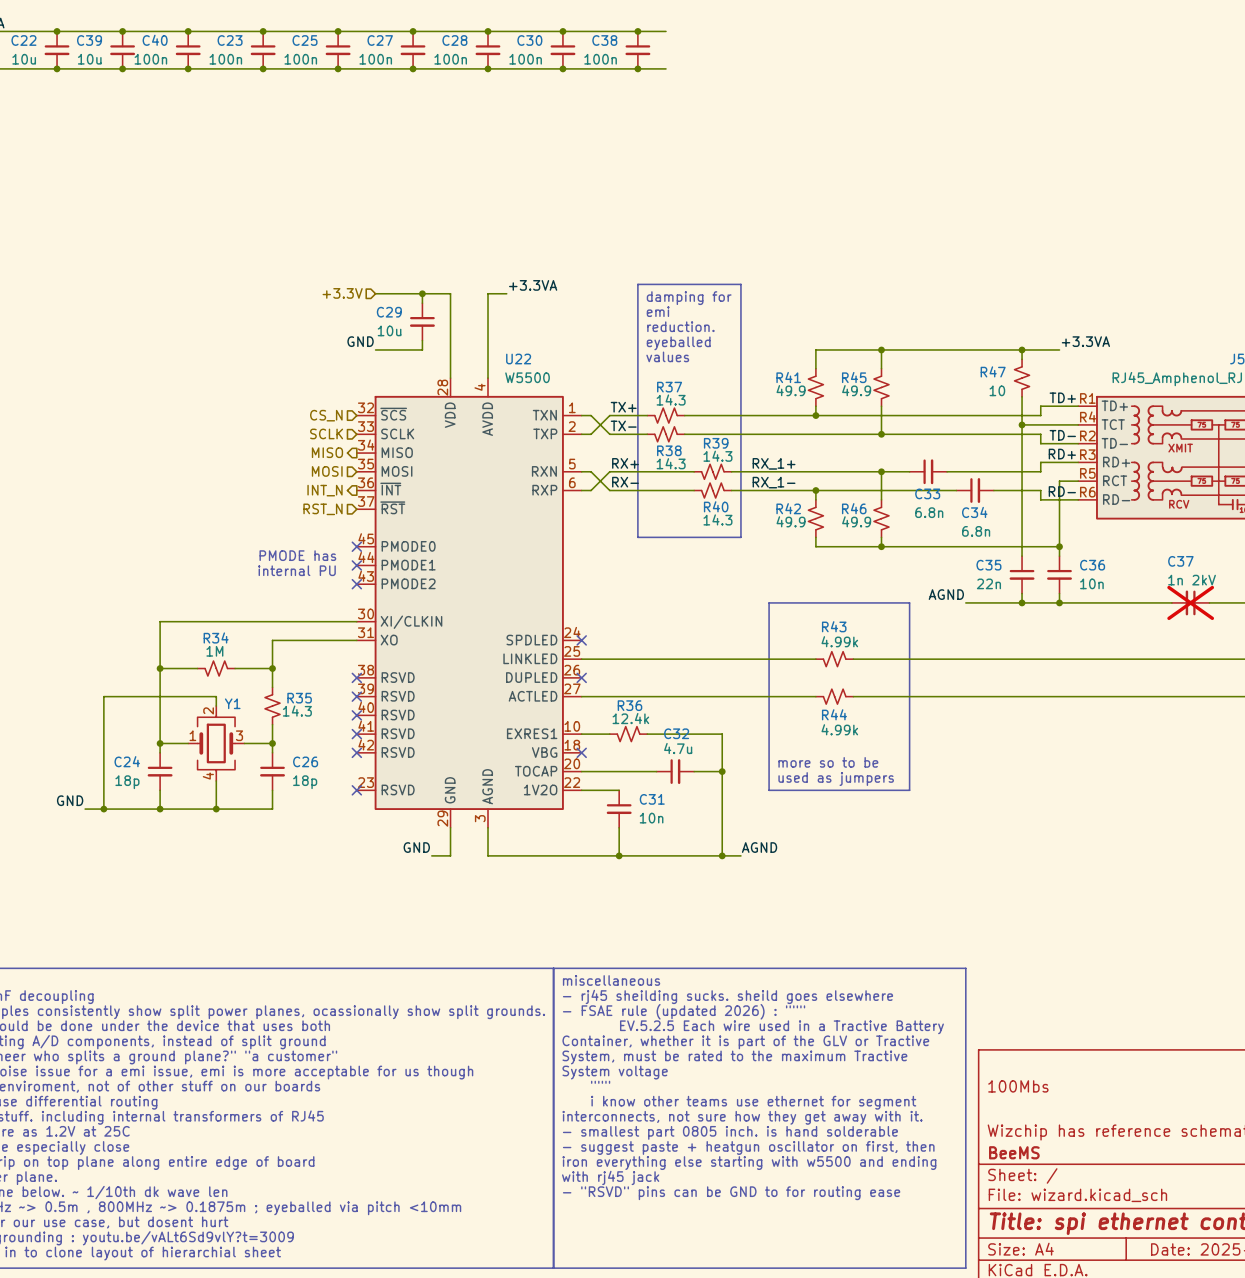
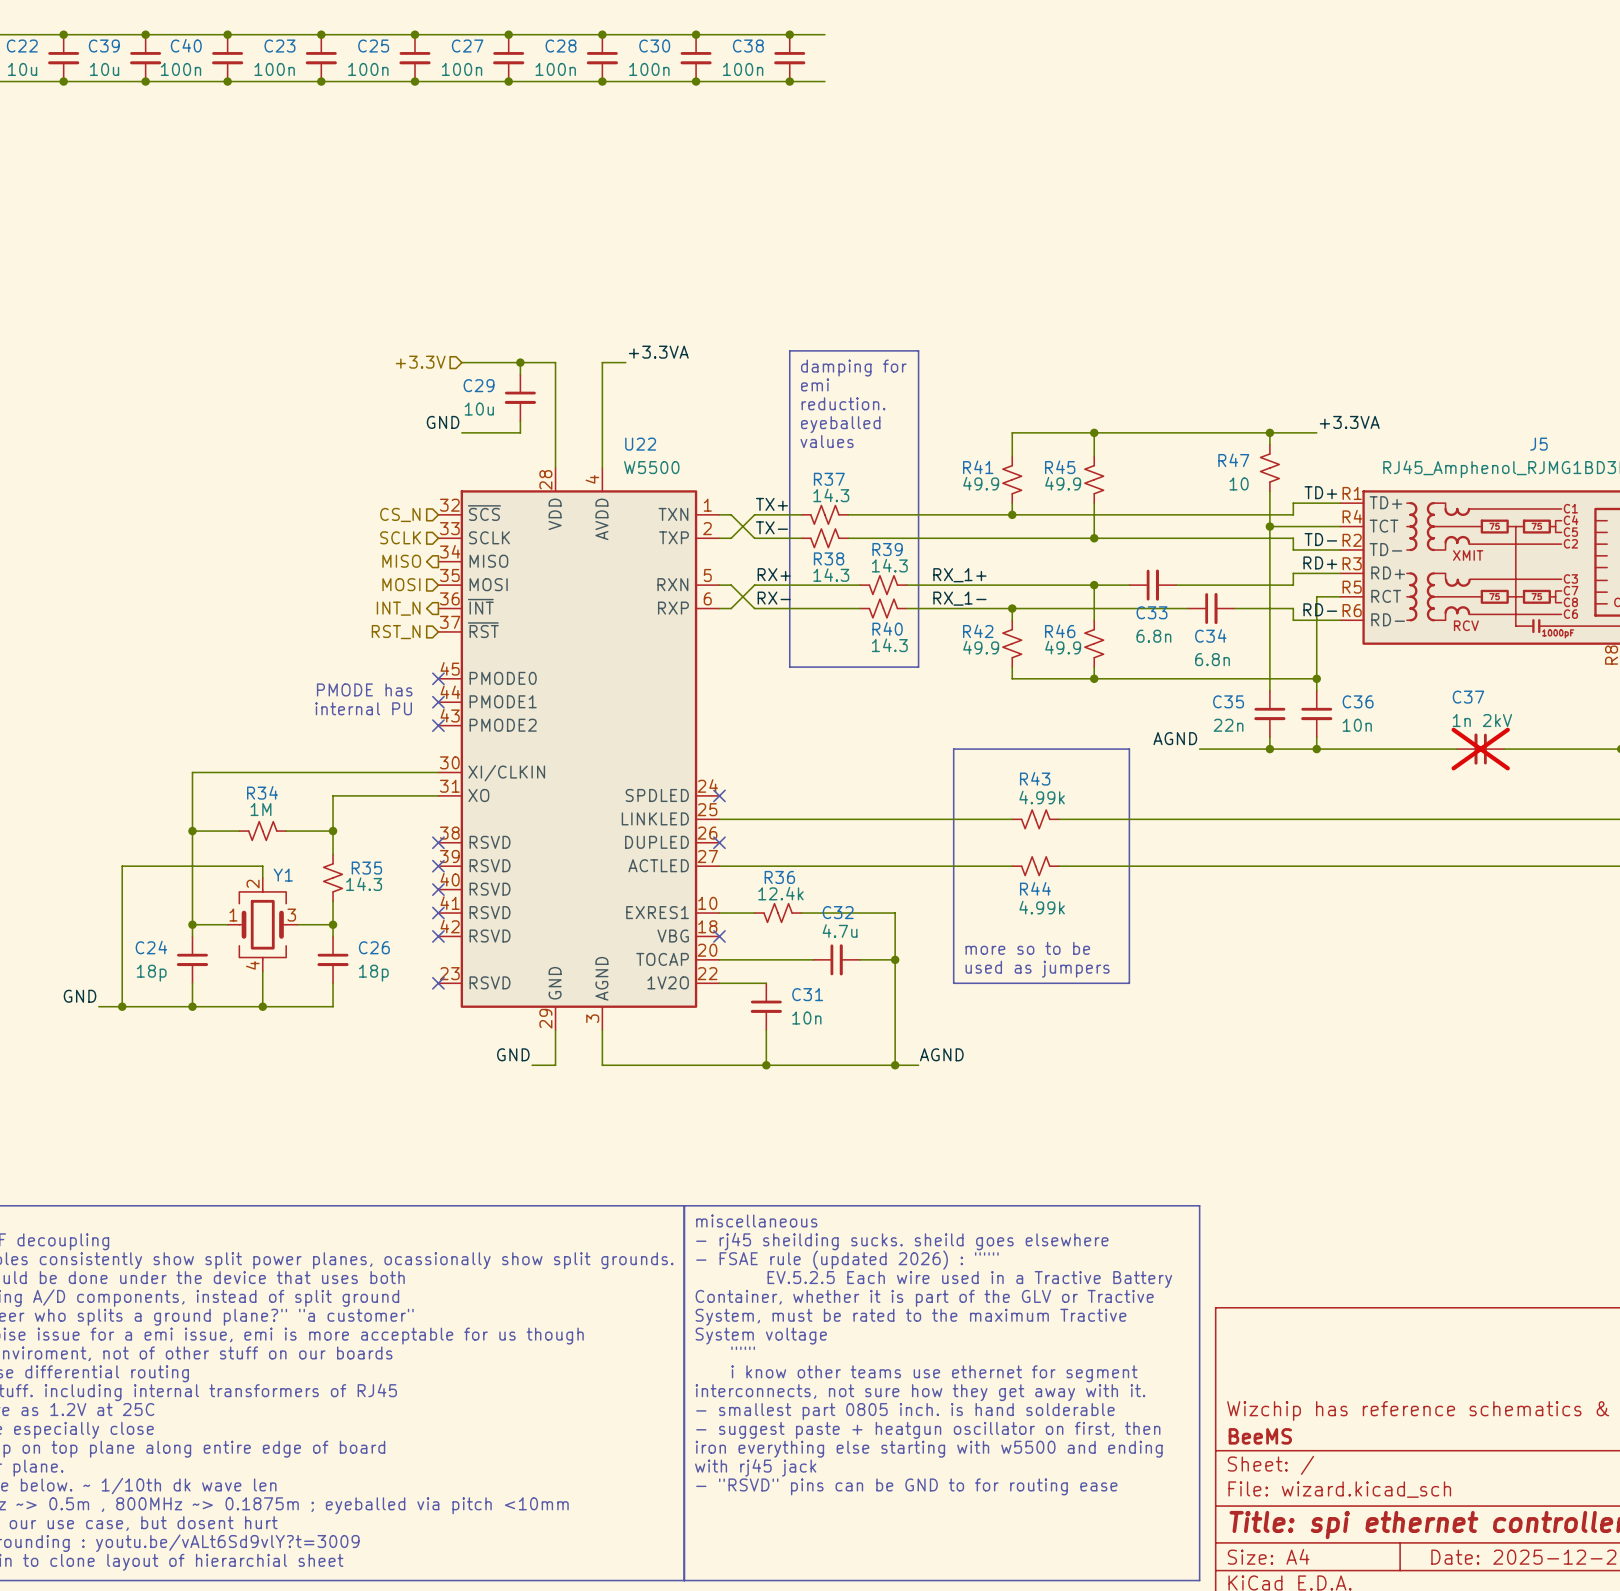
title block: 100Mbs (1018, 1086) -> none

